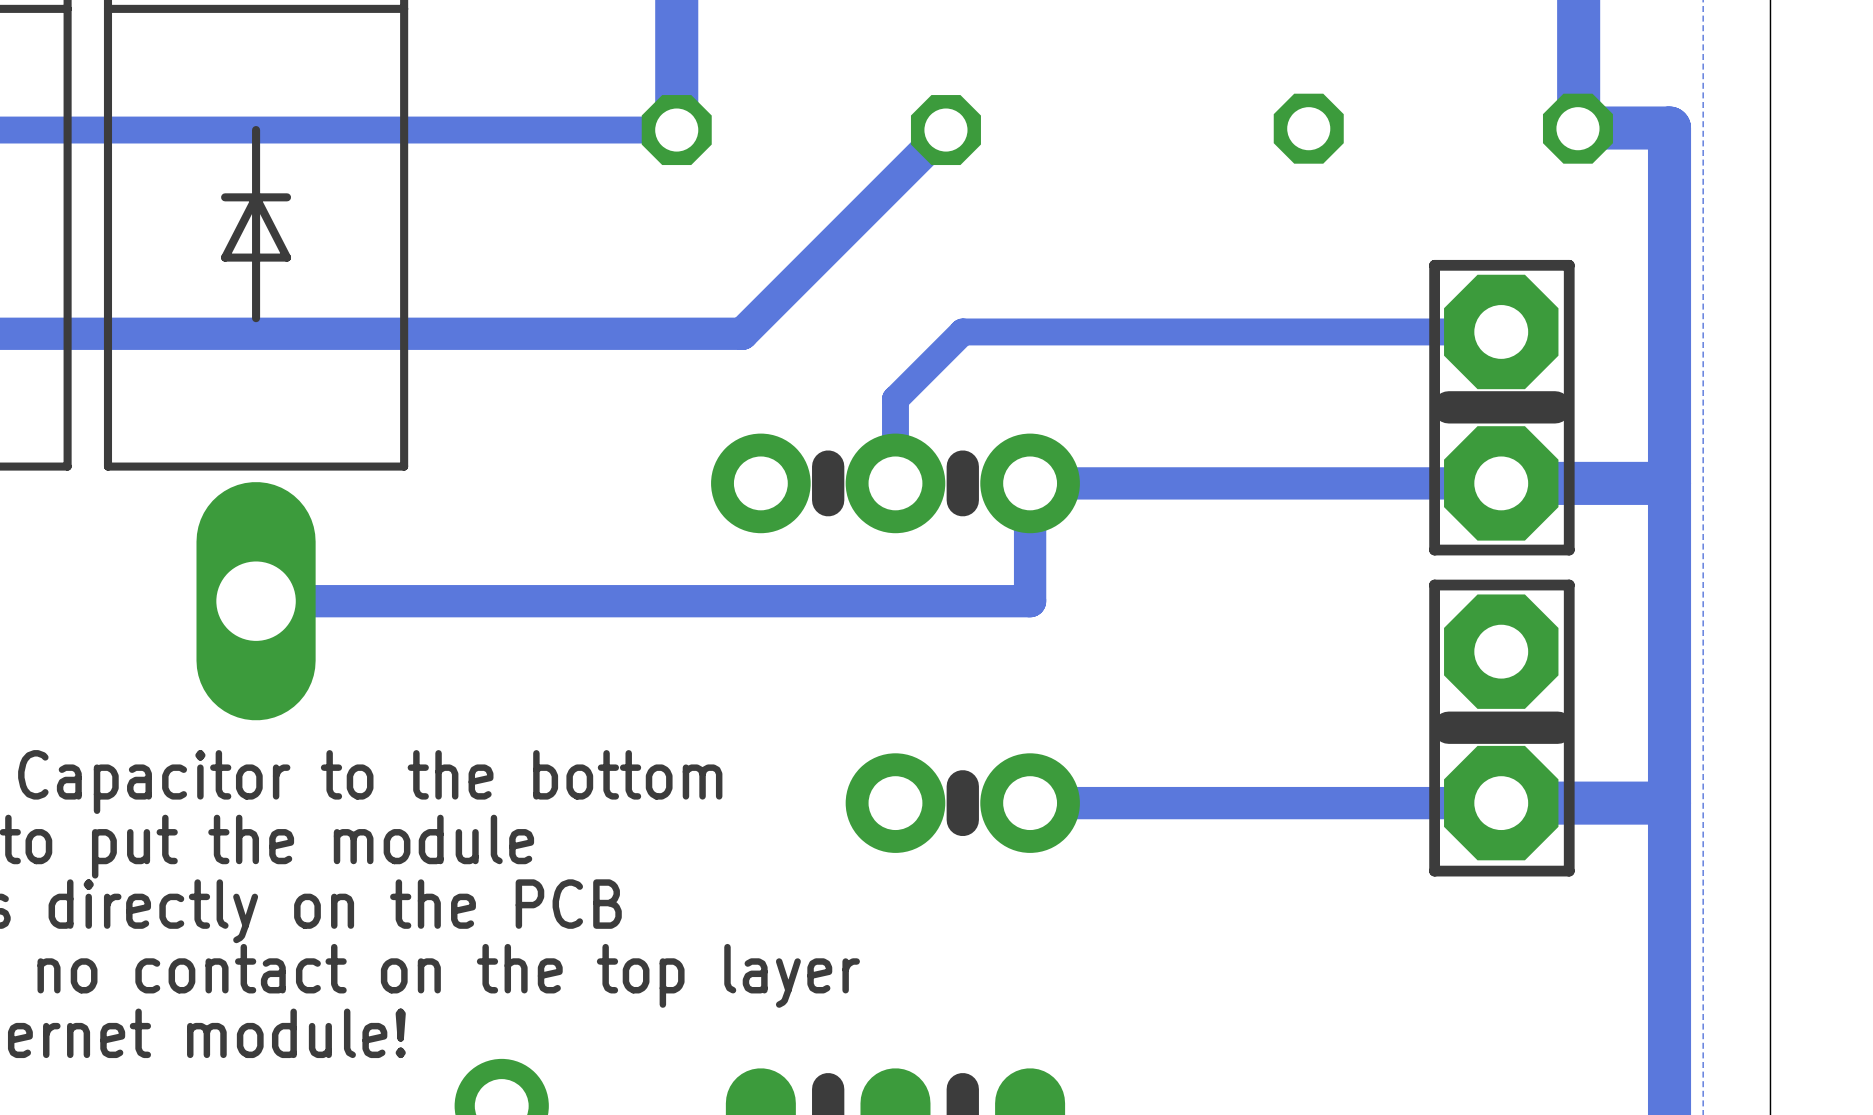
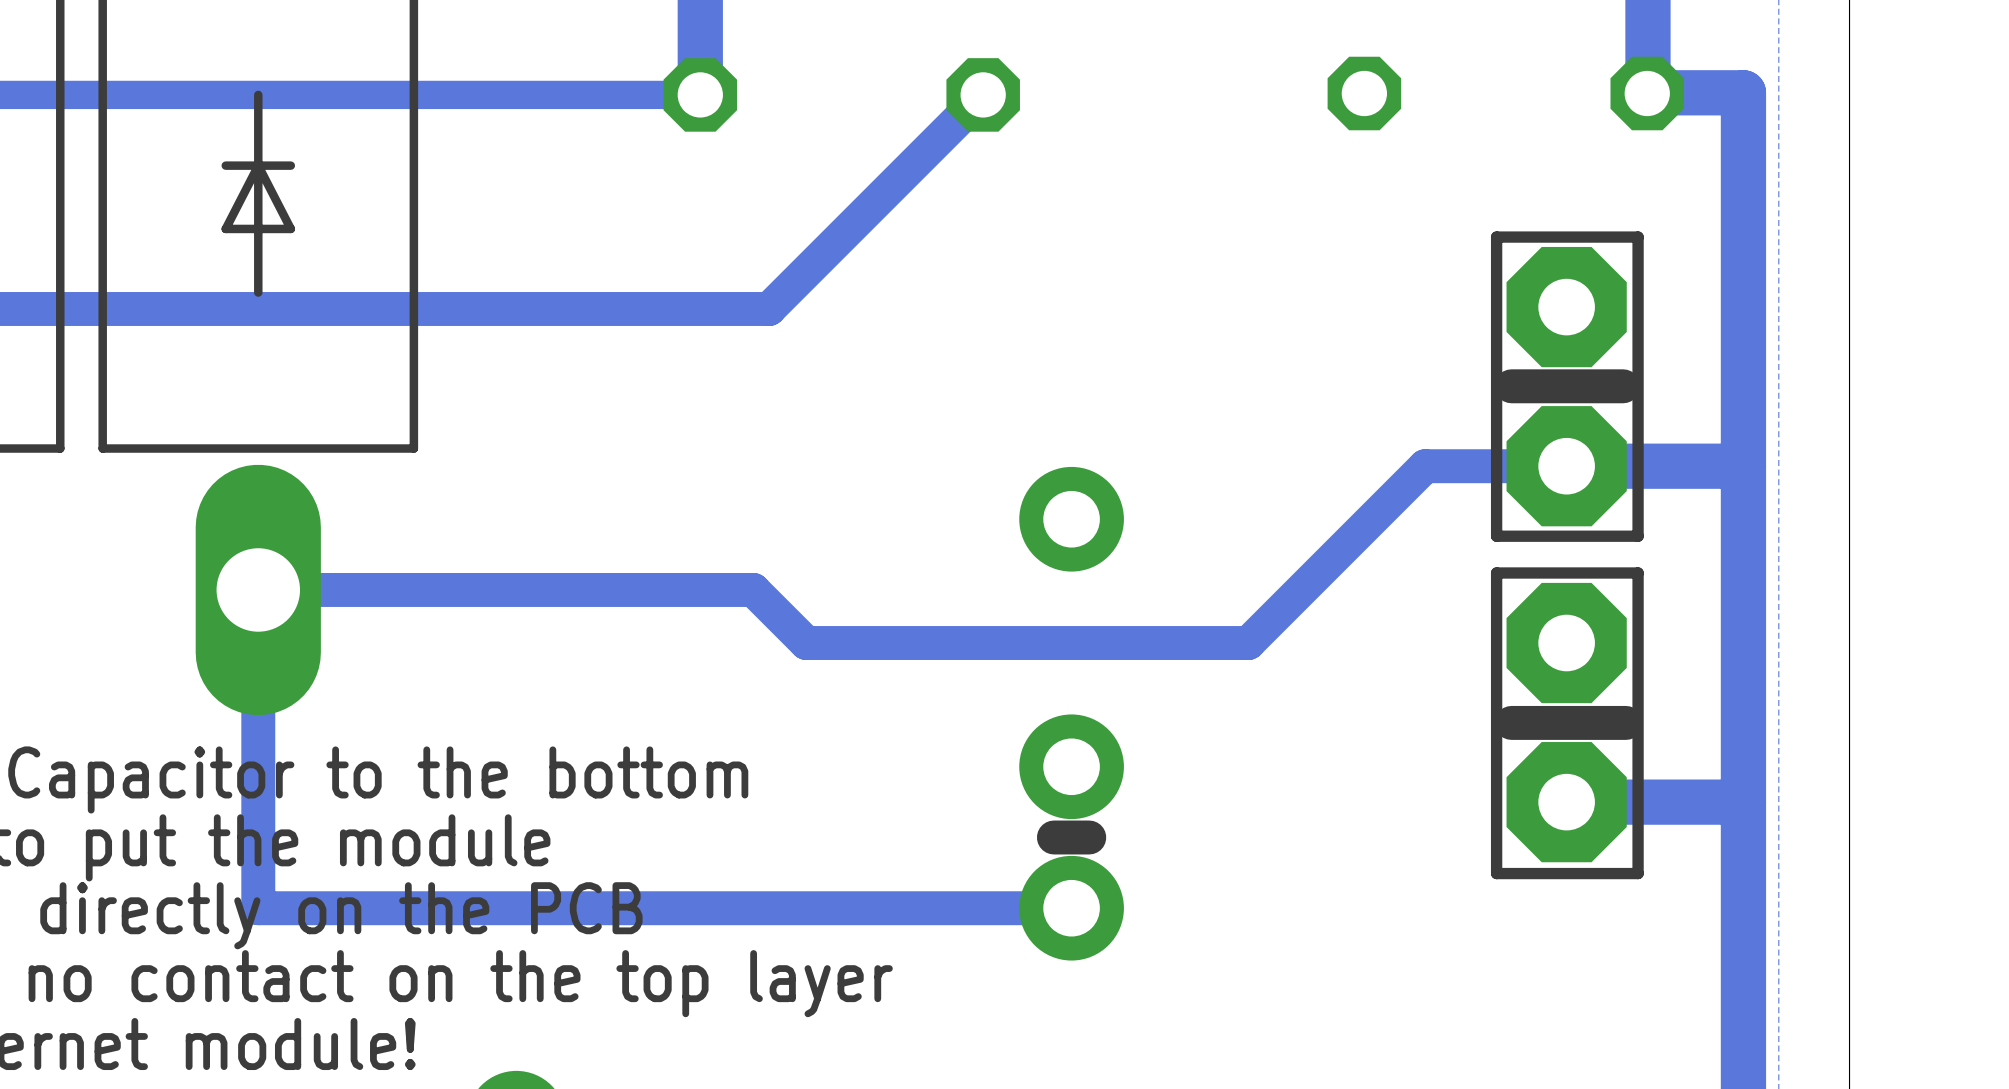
track: (1501, 331) (962, 331) (895, 399) (895, 483) -> none
line: (828, 466) (828, 500) -> none
line: (962, 466) (962, 500) -> none
part: (895, 483) -> none
track: (1366, 483) (1030, 483) (1030, 601) (727, 601) -> (1425, 466) (1248, 643) (806, 643) (753, 589)
part: none -> (1071, 519)
track: none -> (258, 589) (258, 908) (1071, 908)
line: (962, 786) (962, 819) -> none
part rotation: 0° (962, 803) -> 90° clockwise (1071, 837)
track: (1501, 803) (1030, 803) -> none
line: none -> (1089, 837) (1053, 837)

